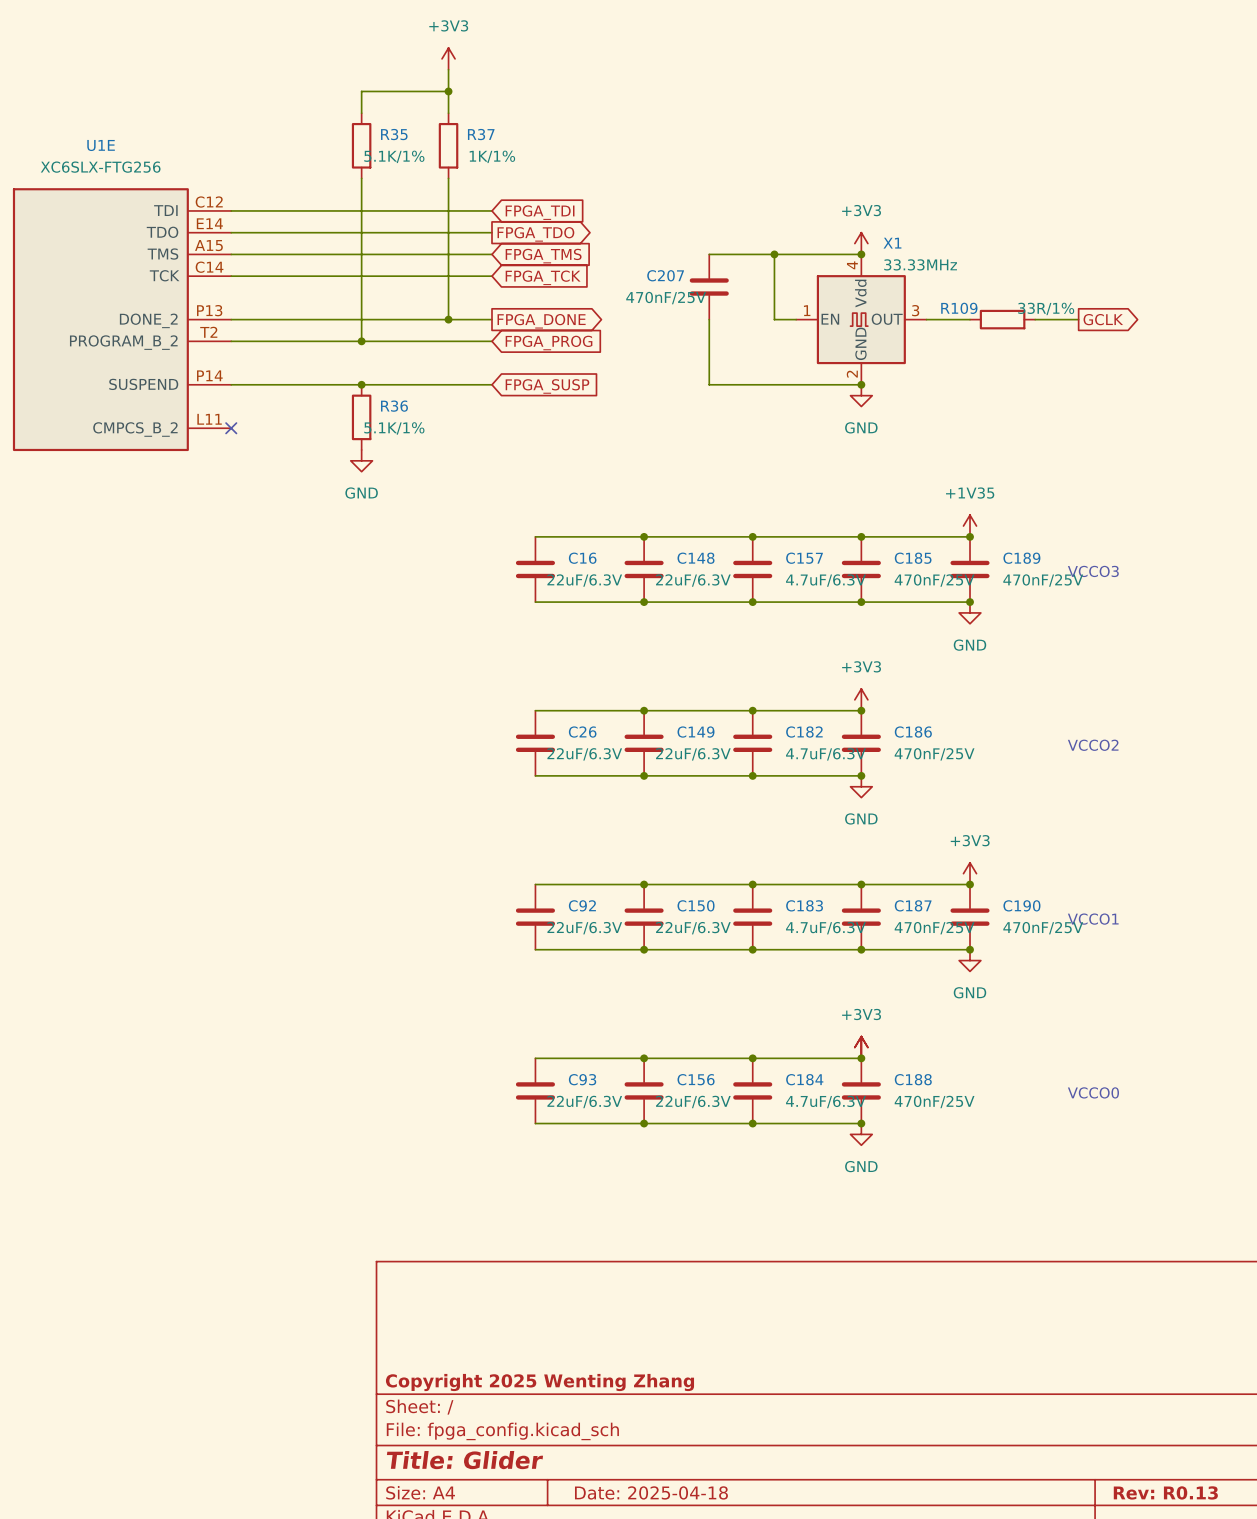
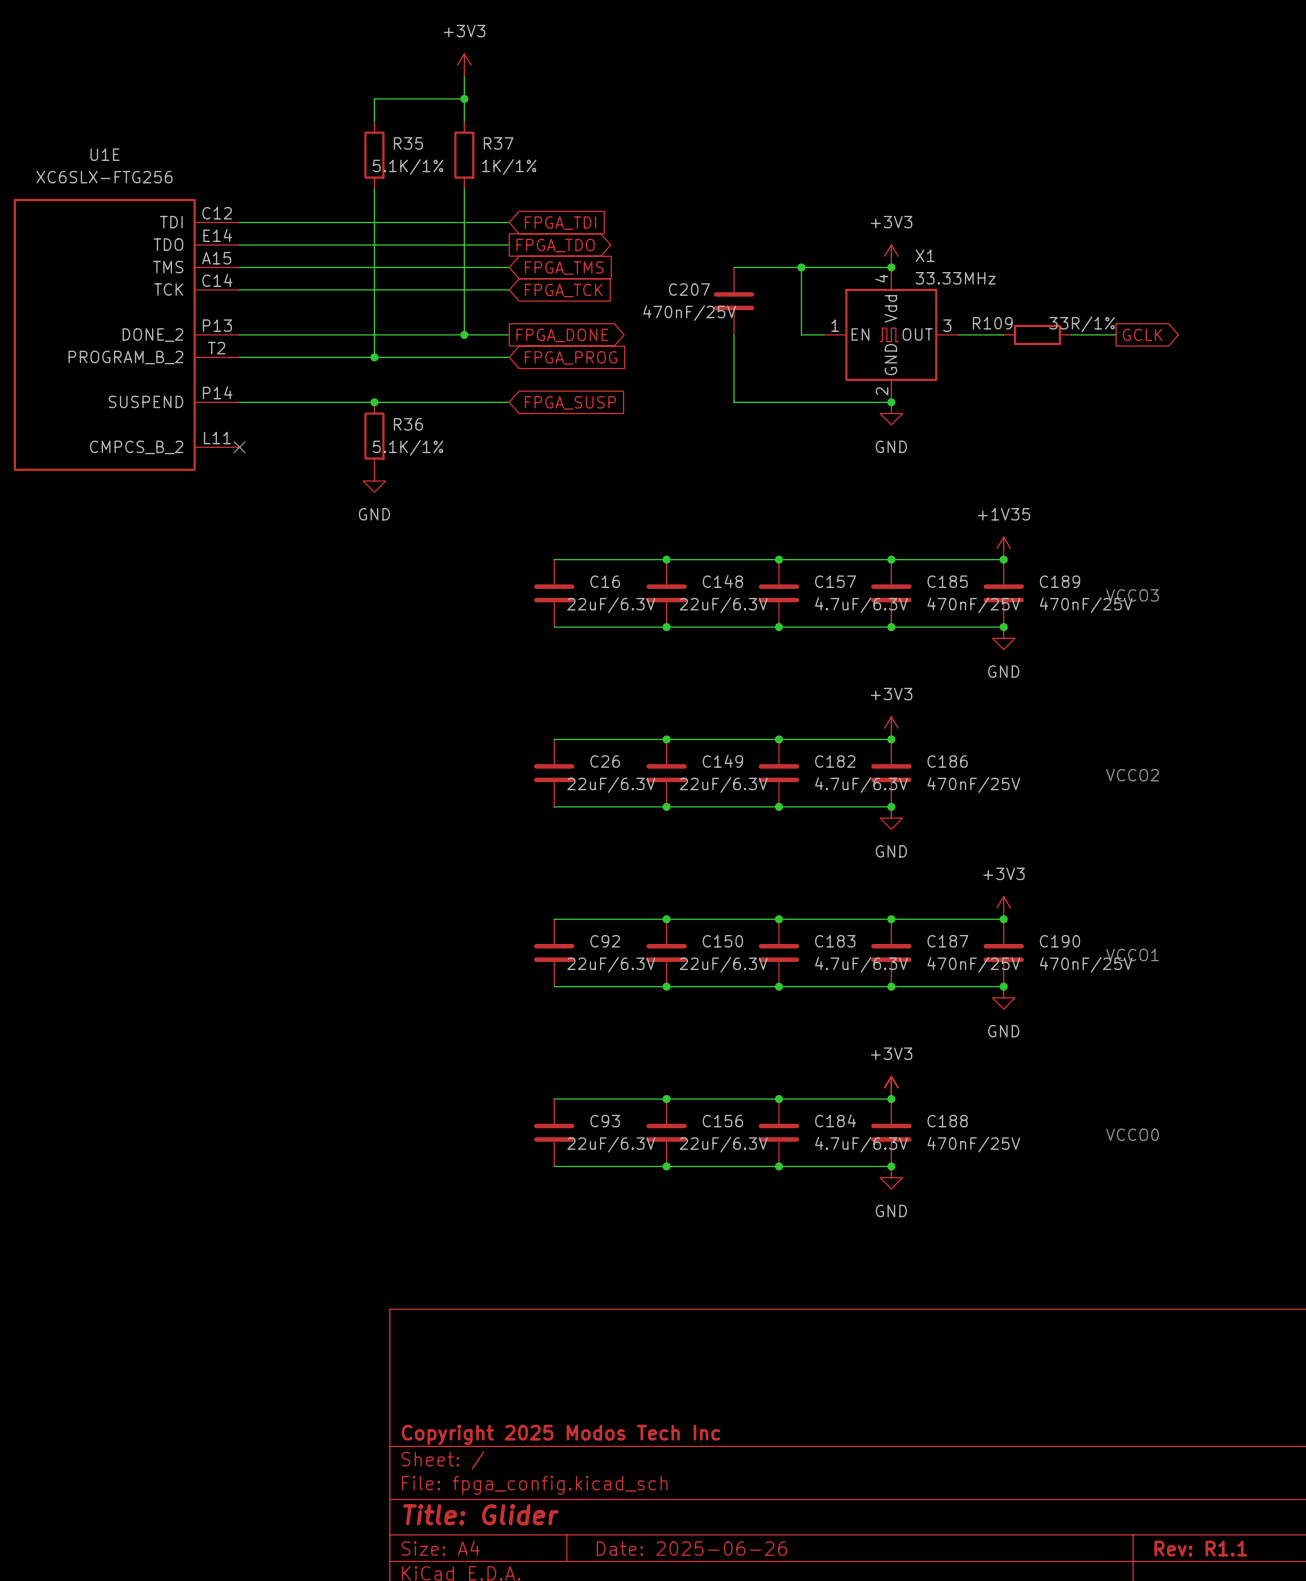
title block: Copyright 2025 Wenting Zhang (539, 1382) -> Copyright 2025 Modos Tech Inc (560, 1434)
title block: Date: 2025-04-18 (651, 1492) -> Date: 2025-06-26 (691, 1548)
title block: Rev: R0.13 (1165, 1492) -> Rev: R1.1 (1200, 1548)

